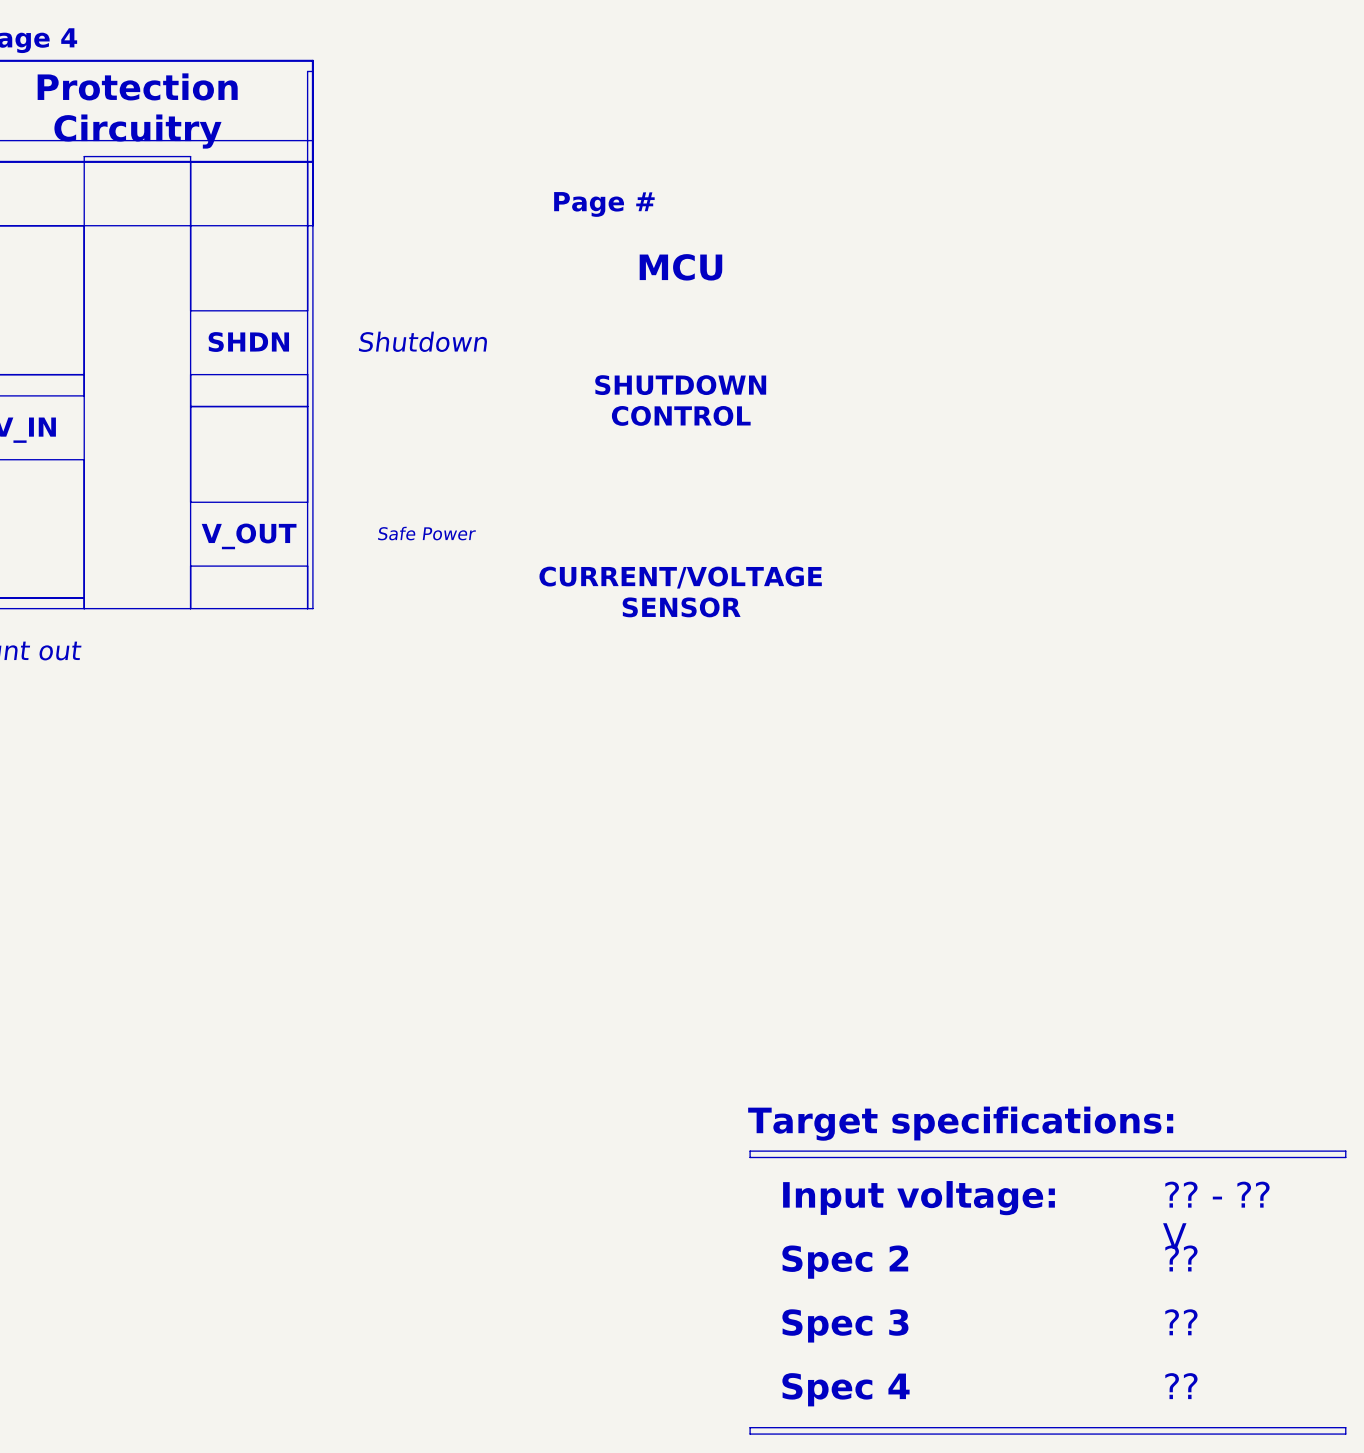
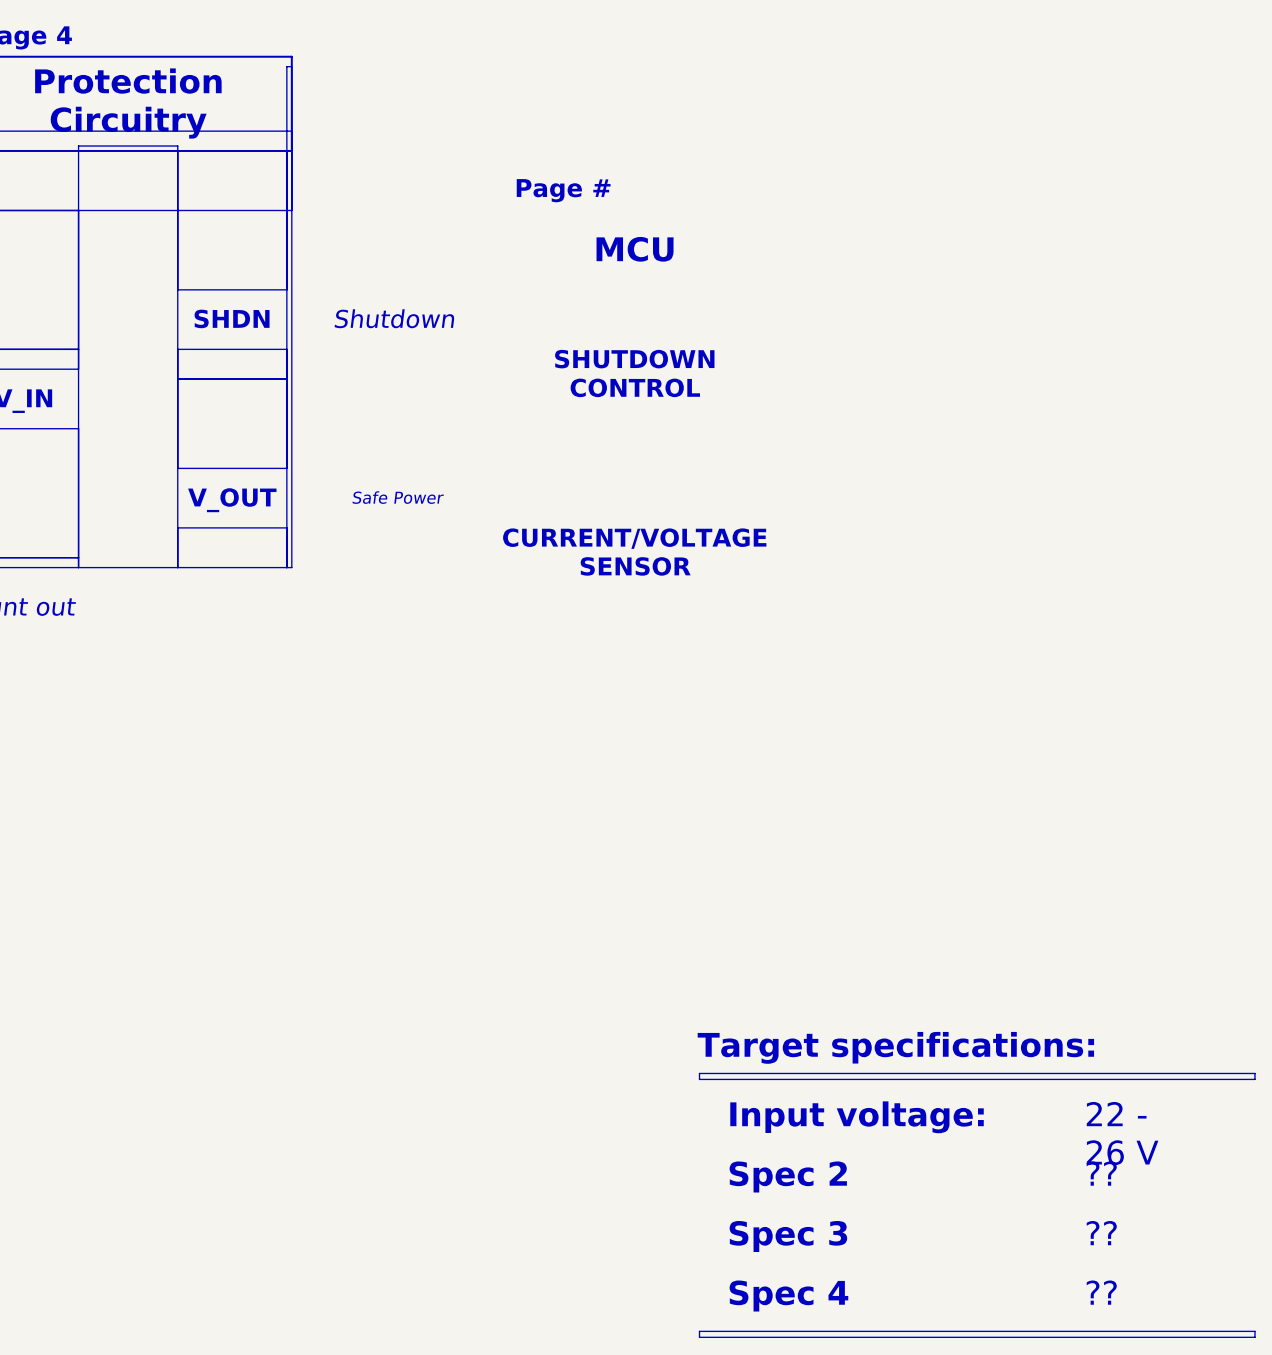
text: ?? - ?? (1217, 1194) -> 22 - (1116, 1114)
text: V (1174, 1235) -> 26 V (1122, 1152)

